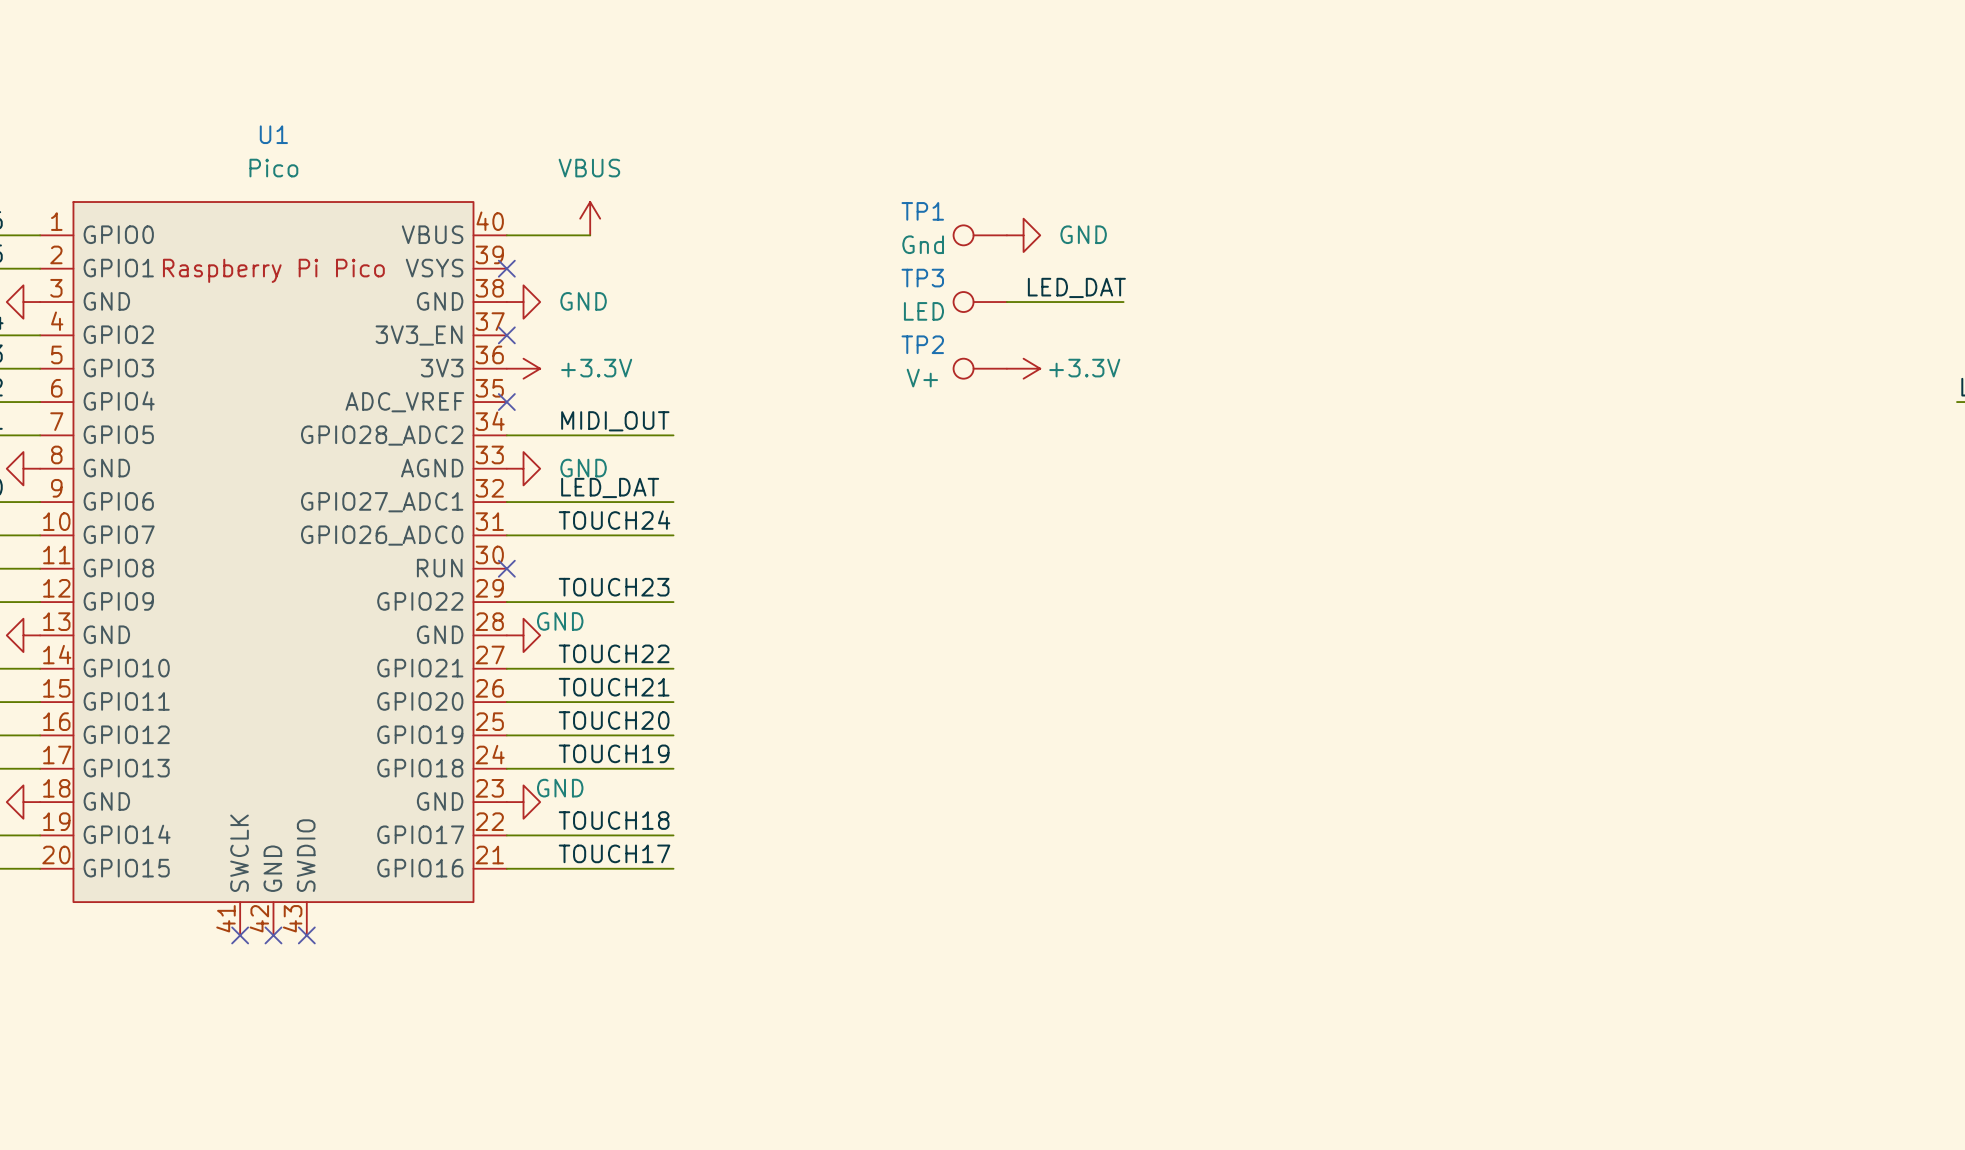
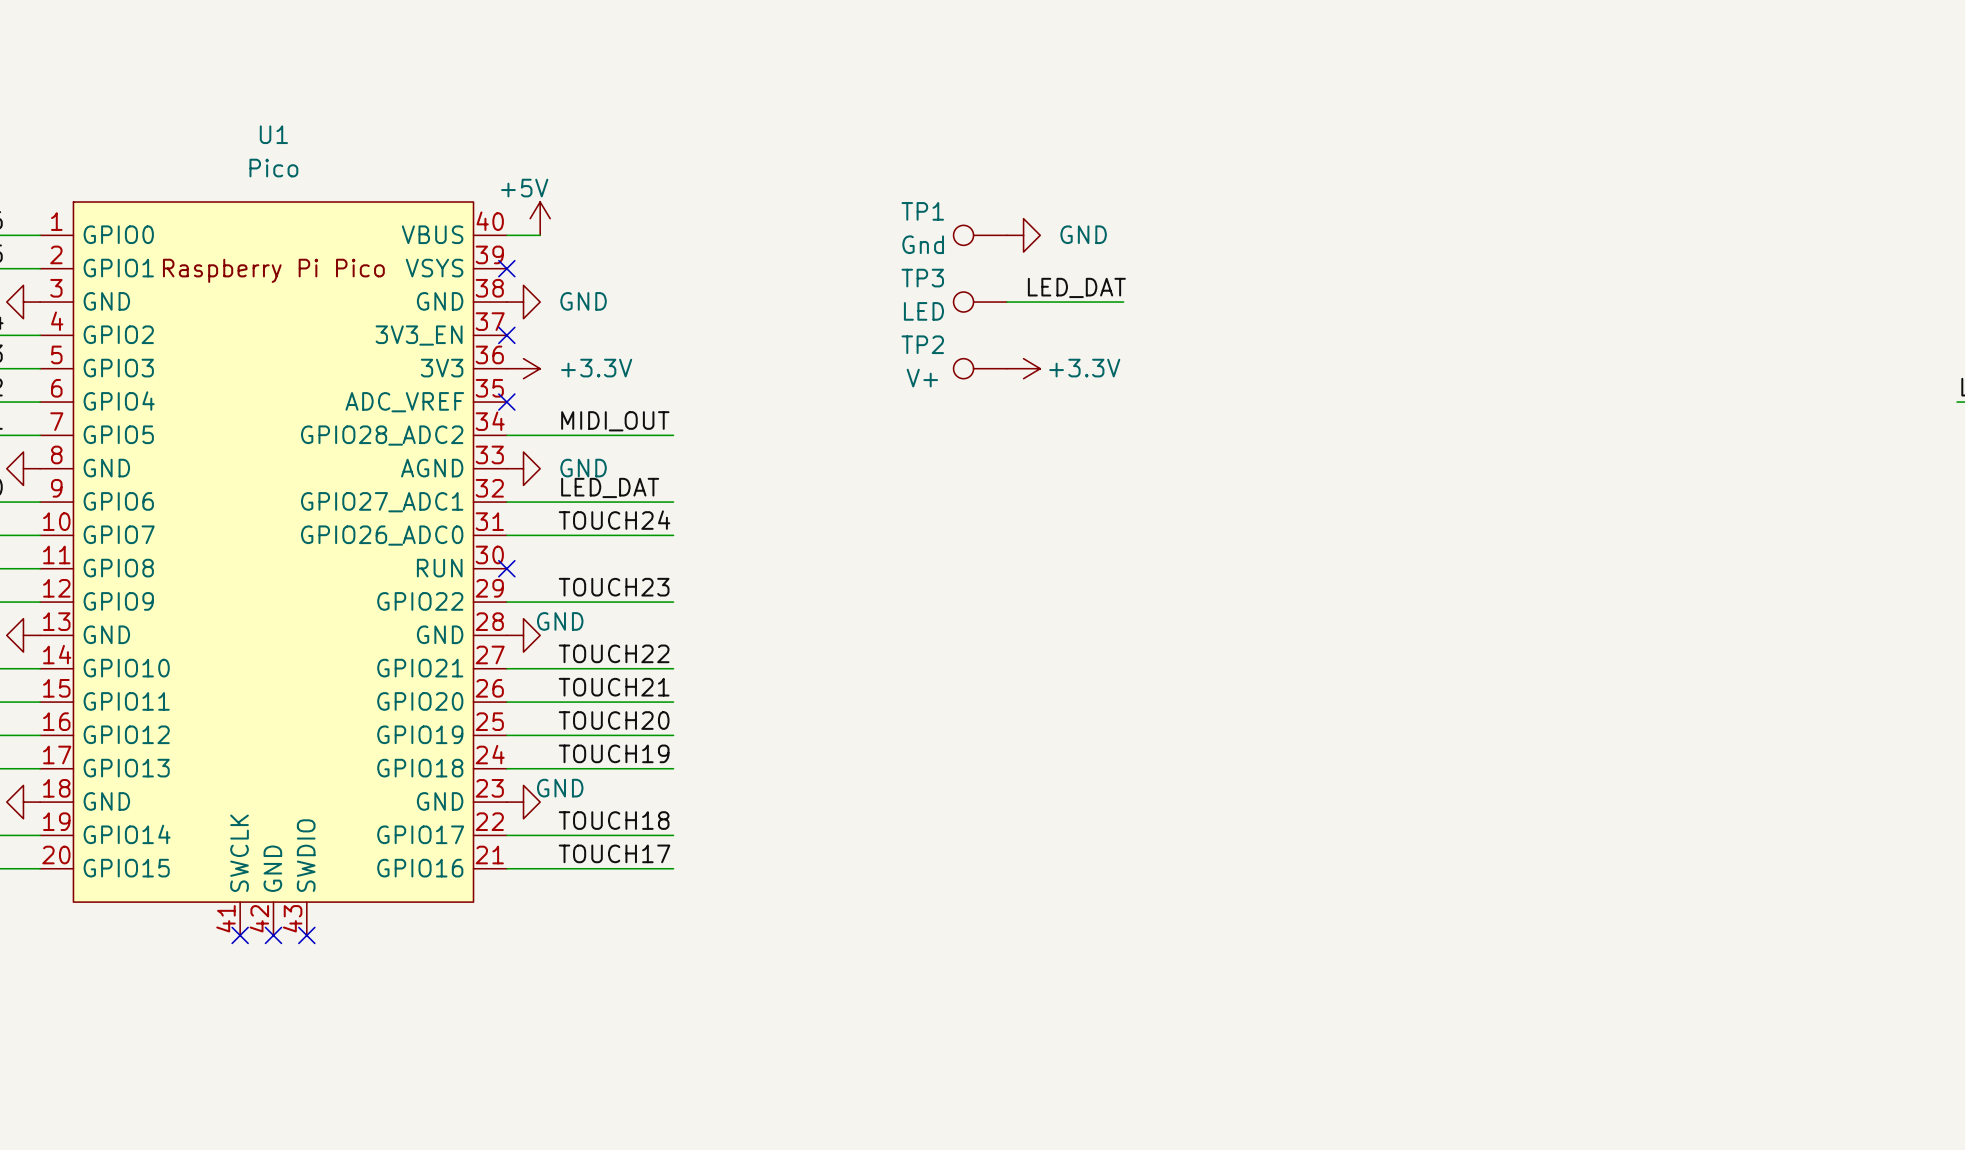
power symbol: none -> +5V (540, 218)
power symbol: VBUS (590, 218) -> none
wire: (540, 235) (590, 235) -> none

